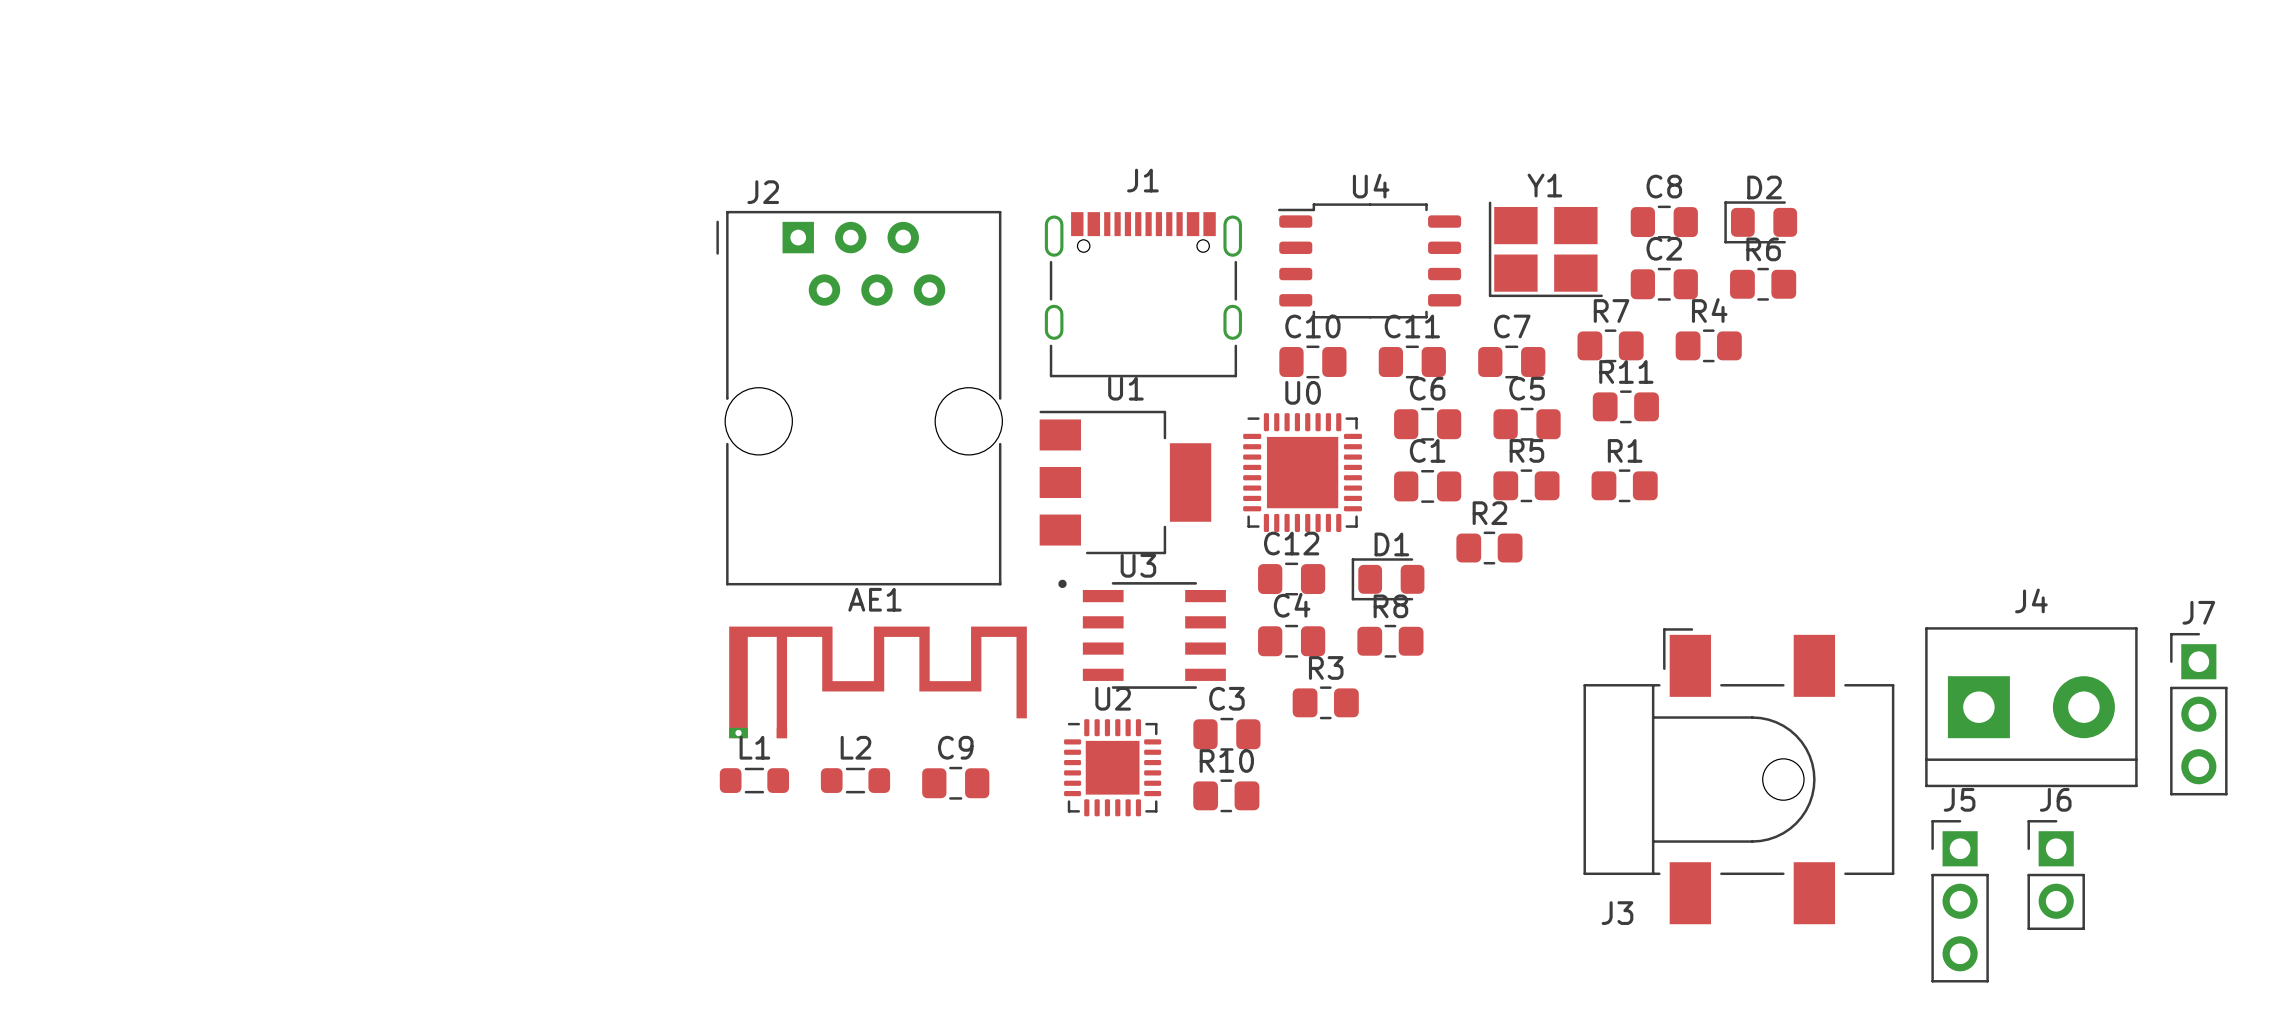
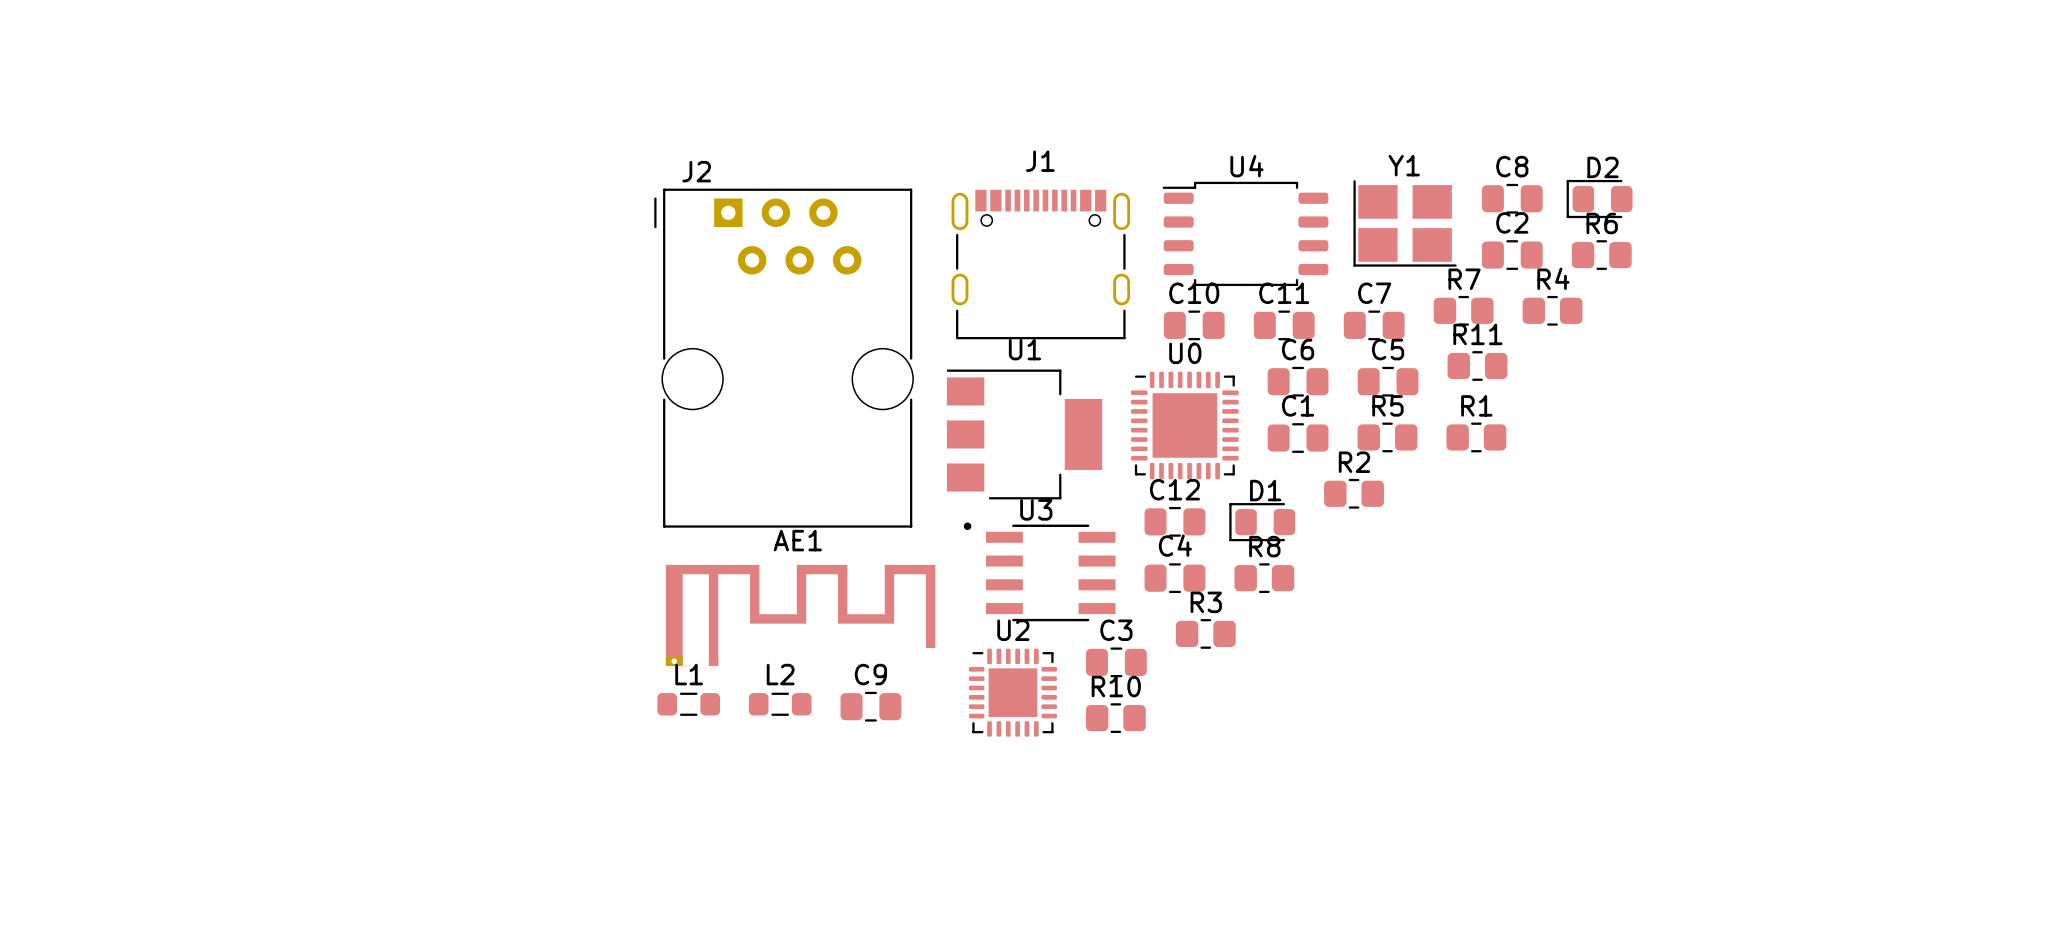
J4: (2031, 707) -> none
J7: (2198, 714) -> none
J3: (1738, 776) -> none
J6: (2056, 875) -> none
J5: (1960, 901) -> none

